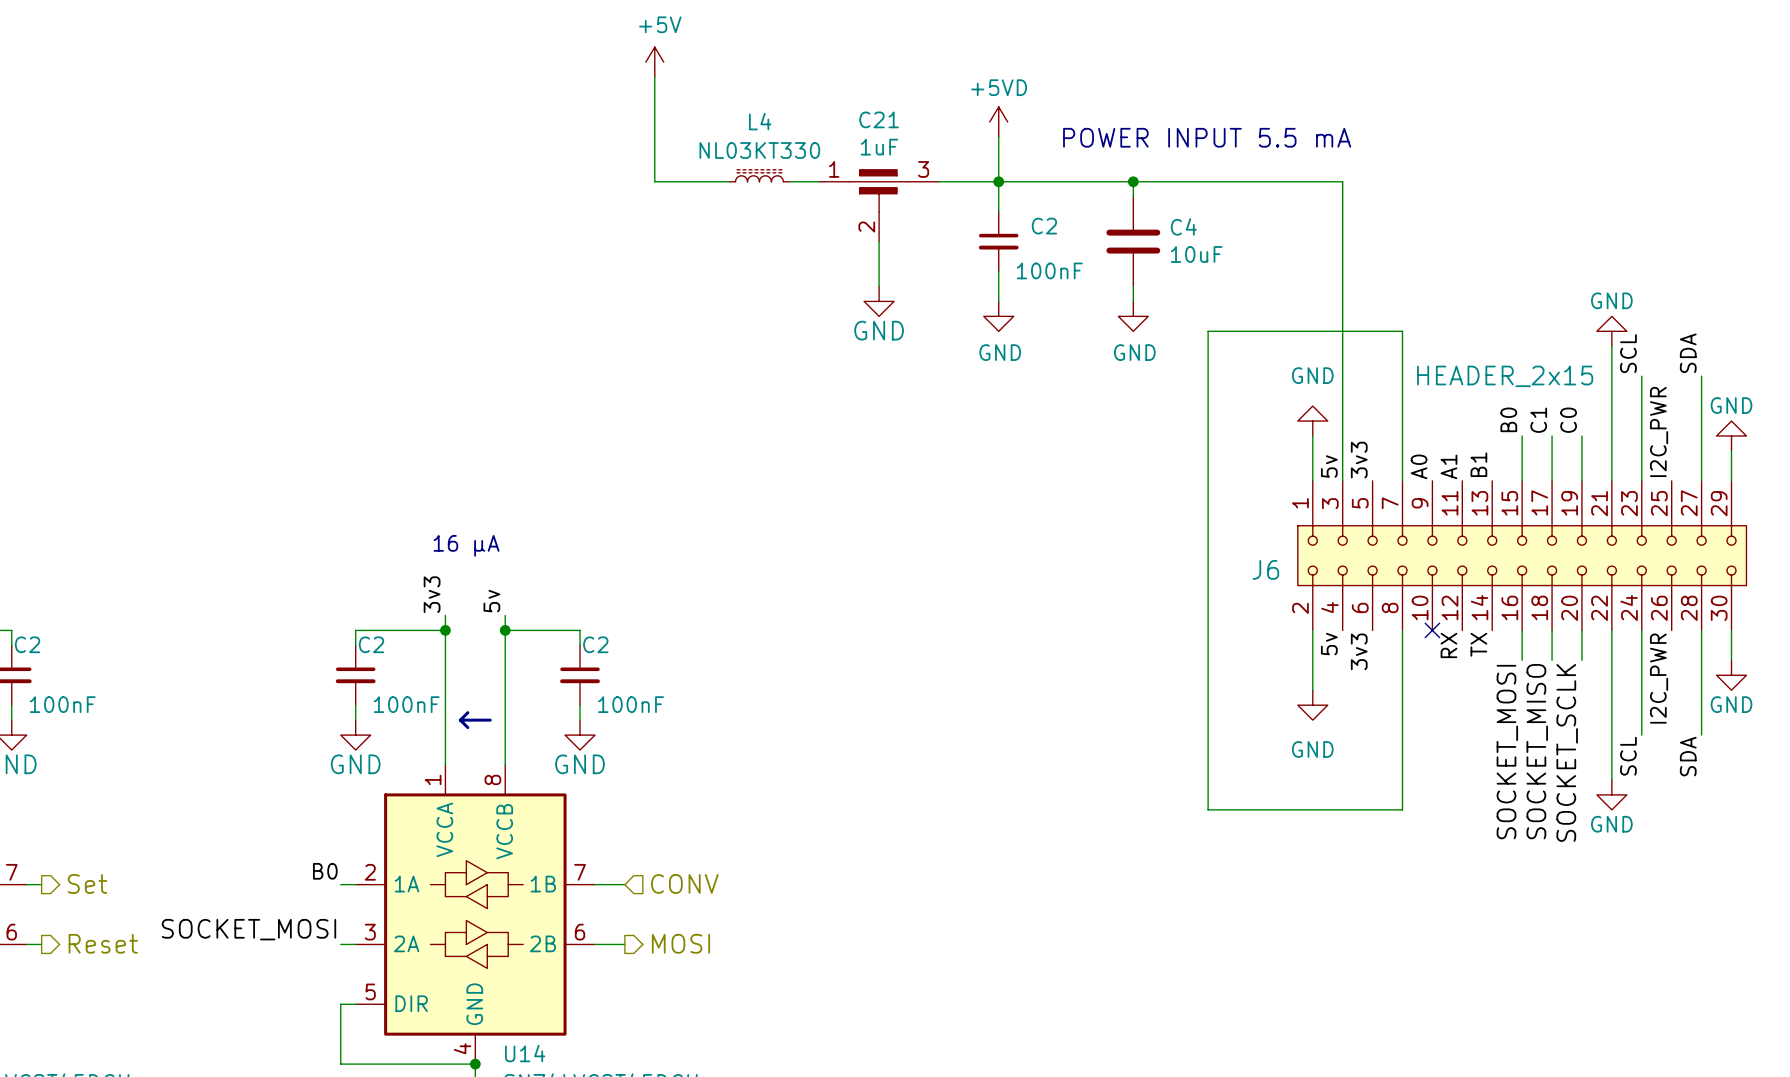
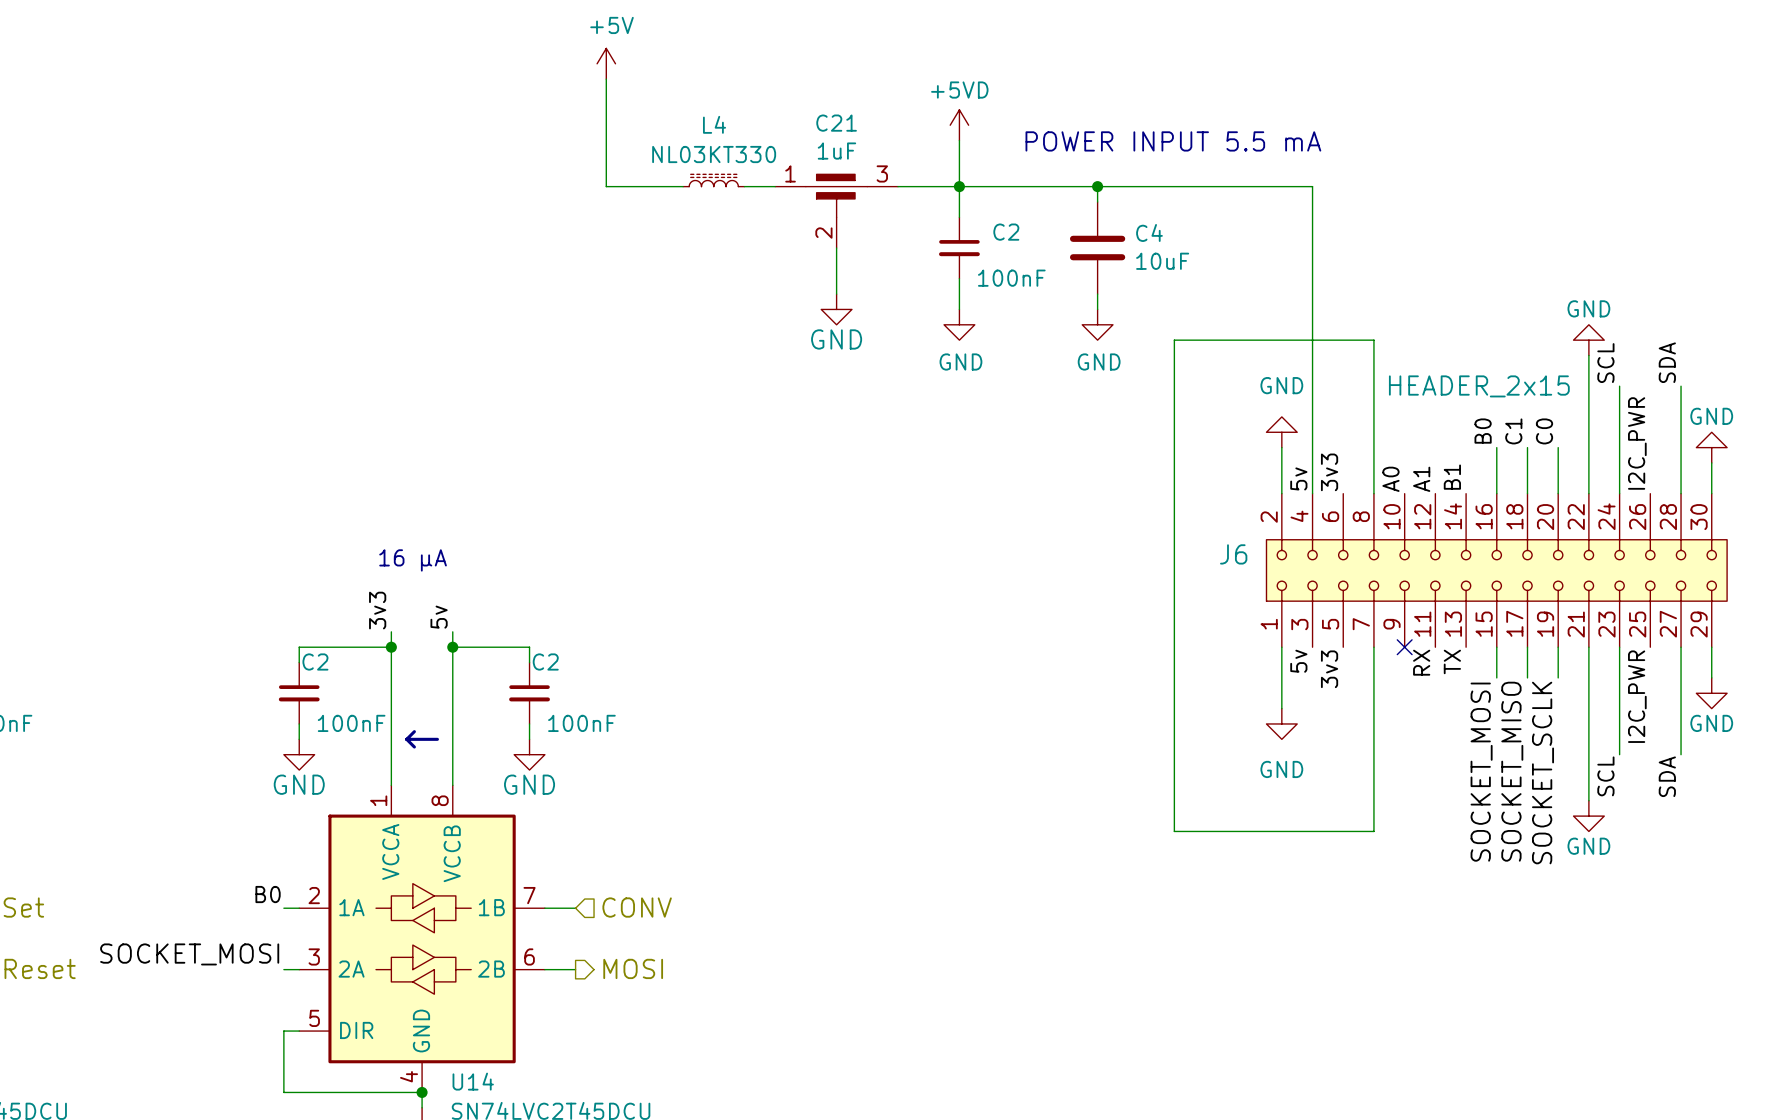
J6 flip: as is (1522, 555) -> up-down (1496, 570)

